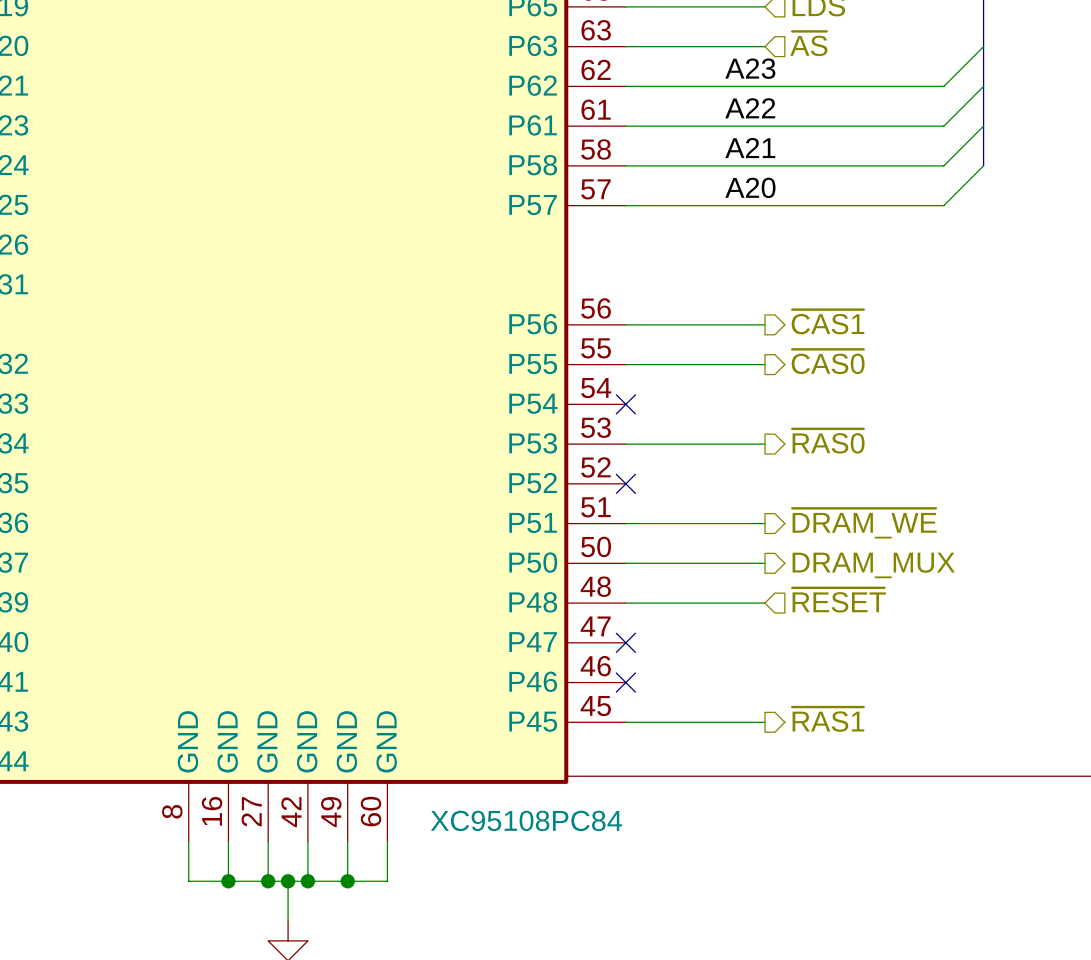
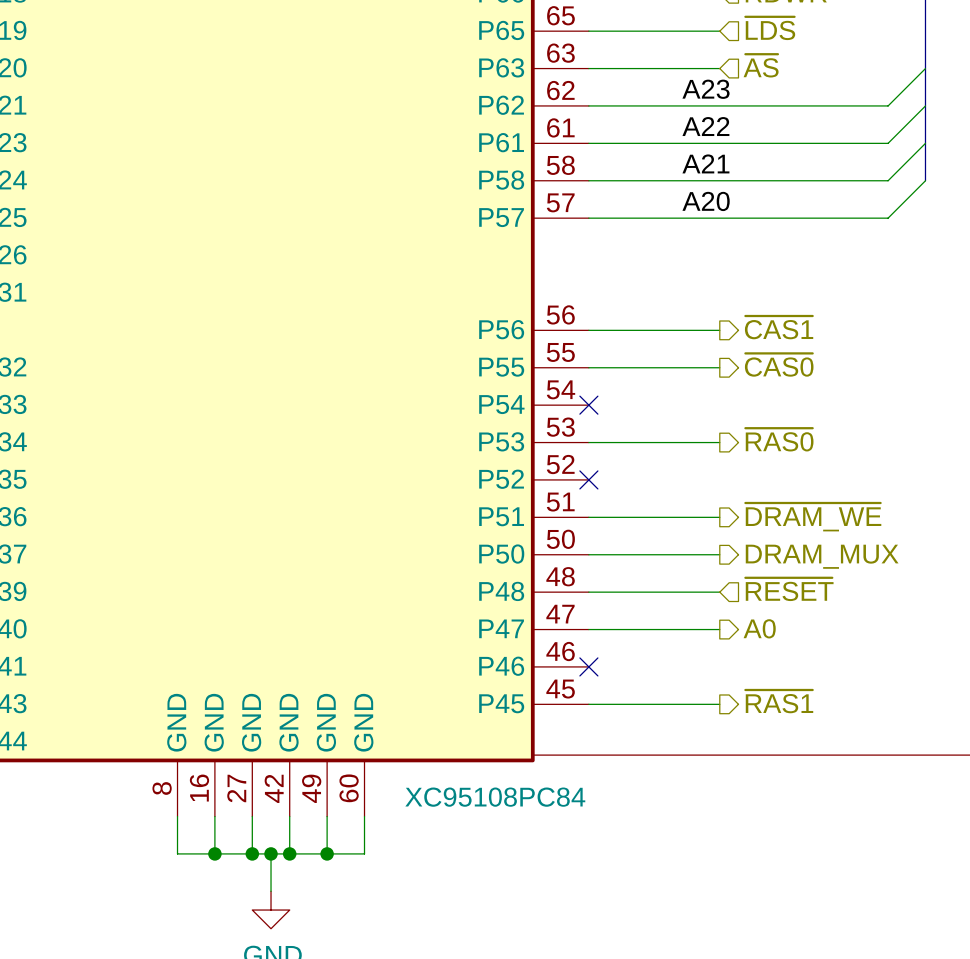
wire: none -> (588, 629) (719, 629)
no-connect mark: (625, 642) -> none
hierarchical label: none -> A0 (759, 628)

